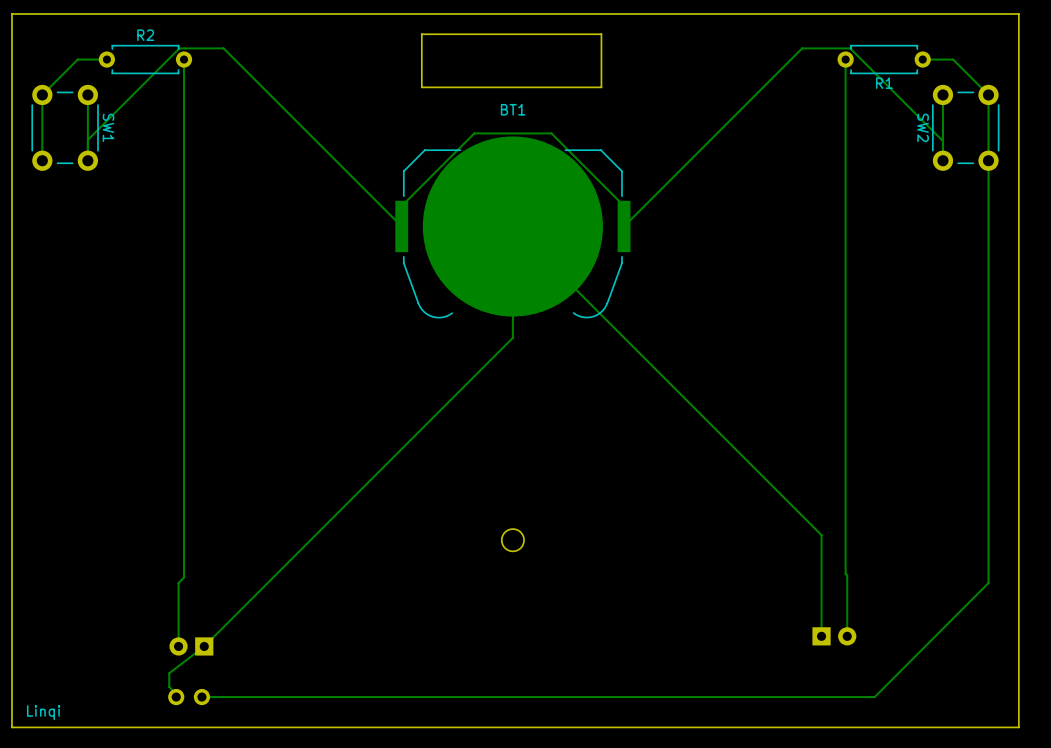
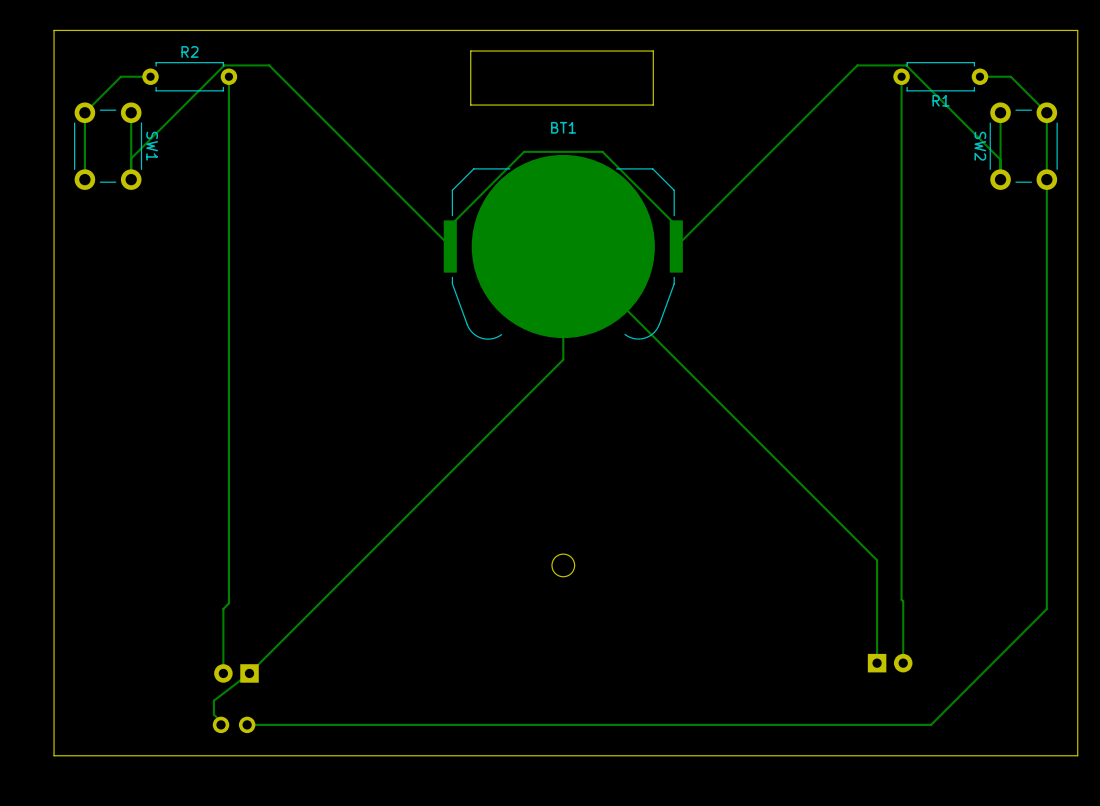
text: Linqi (43, 712) -> none

